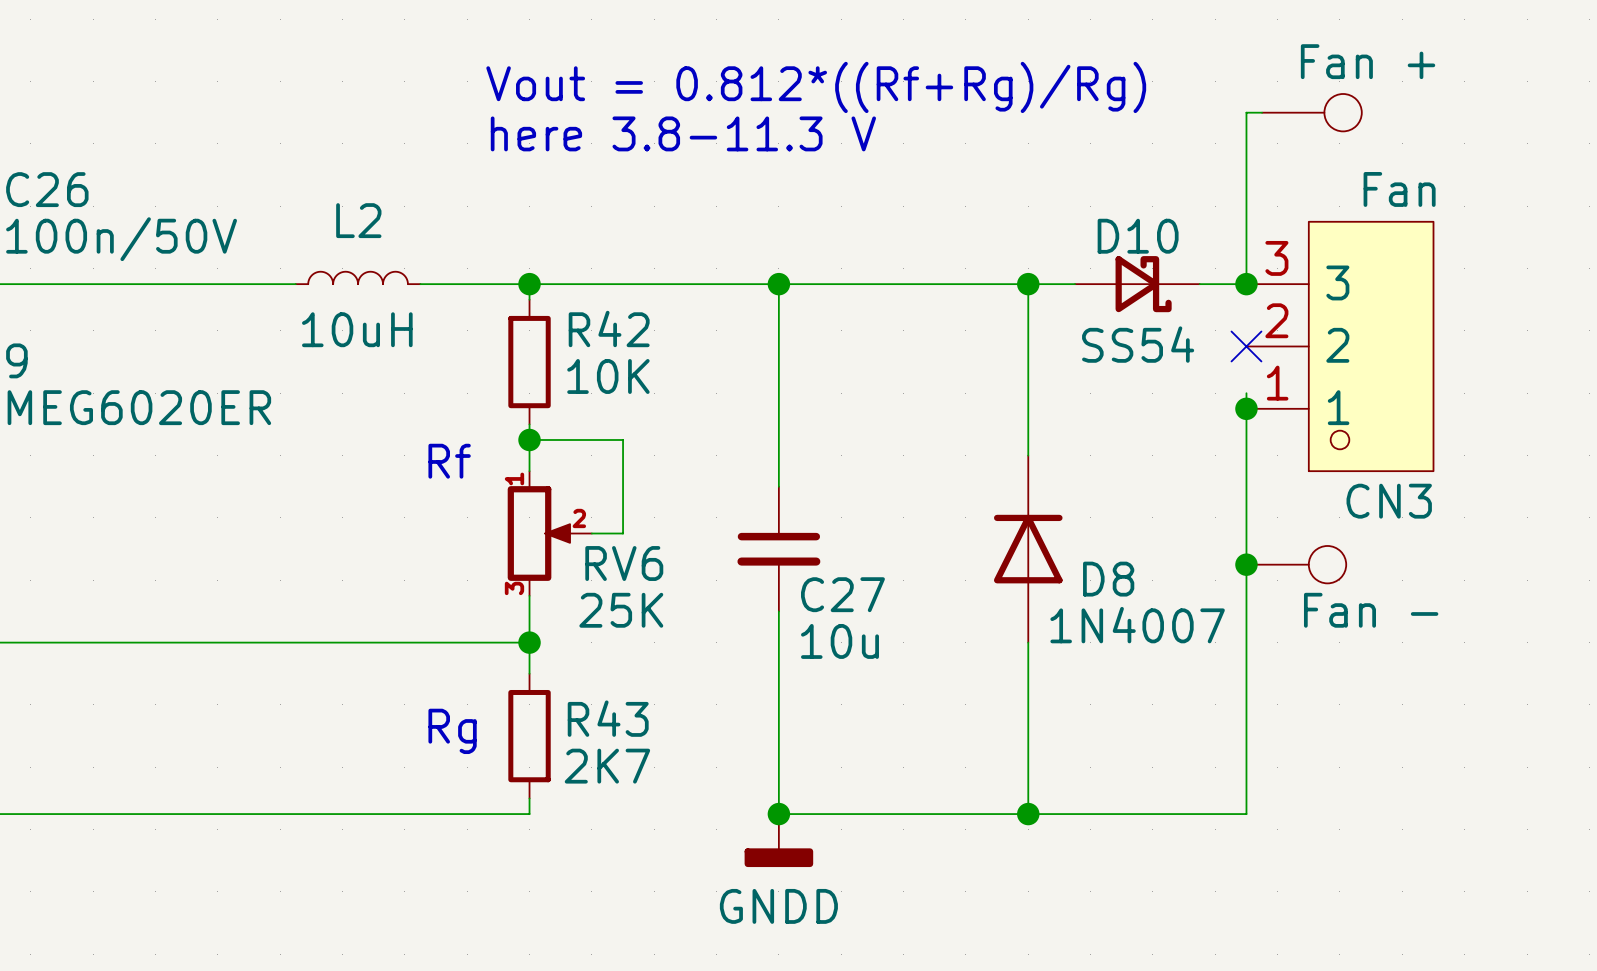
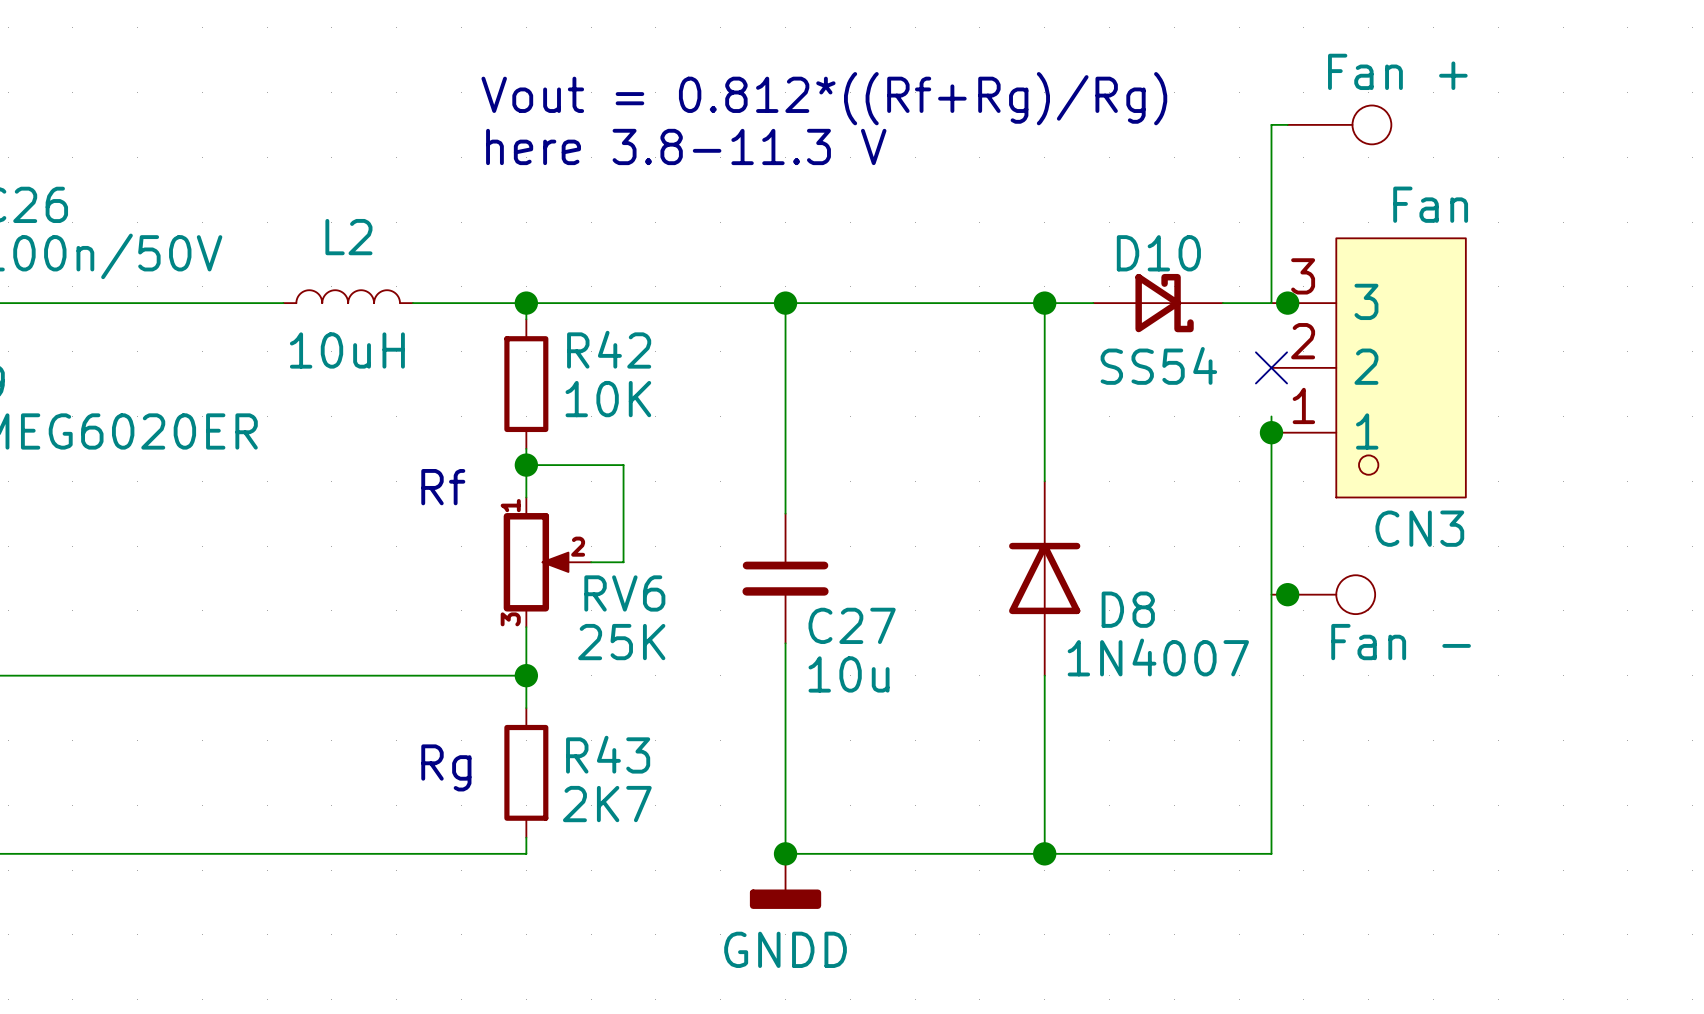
junction position: (1246, 284) -> (1287, 303)
junction position: (1246, 564) -> (1287, 594)

